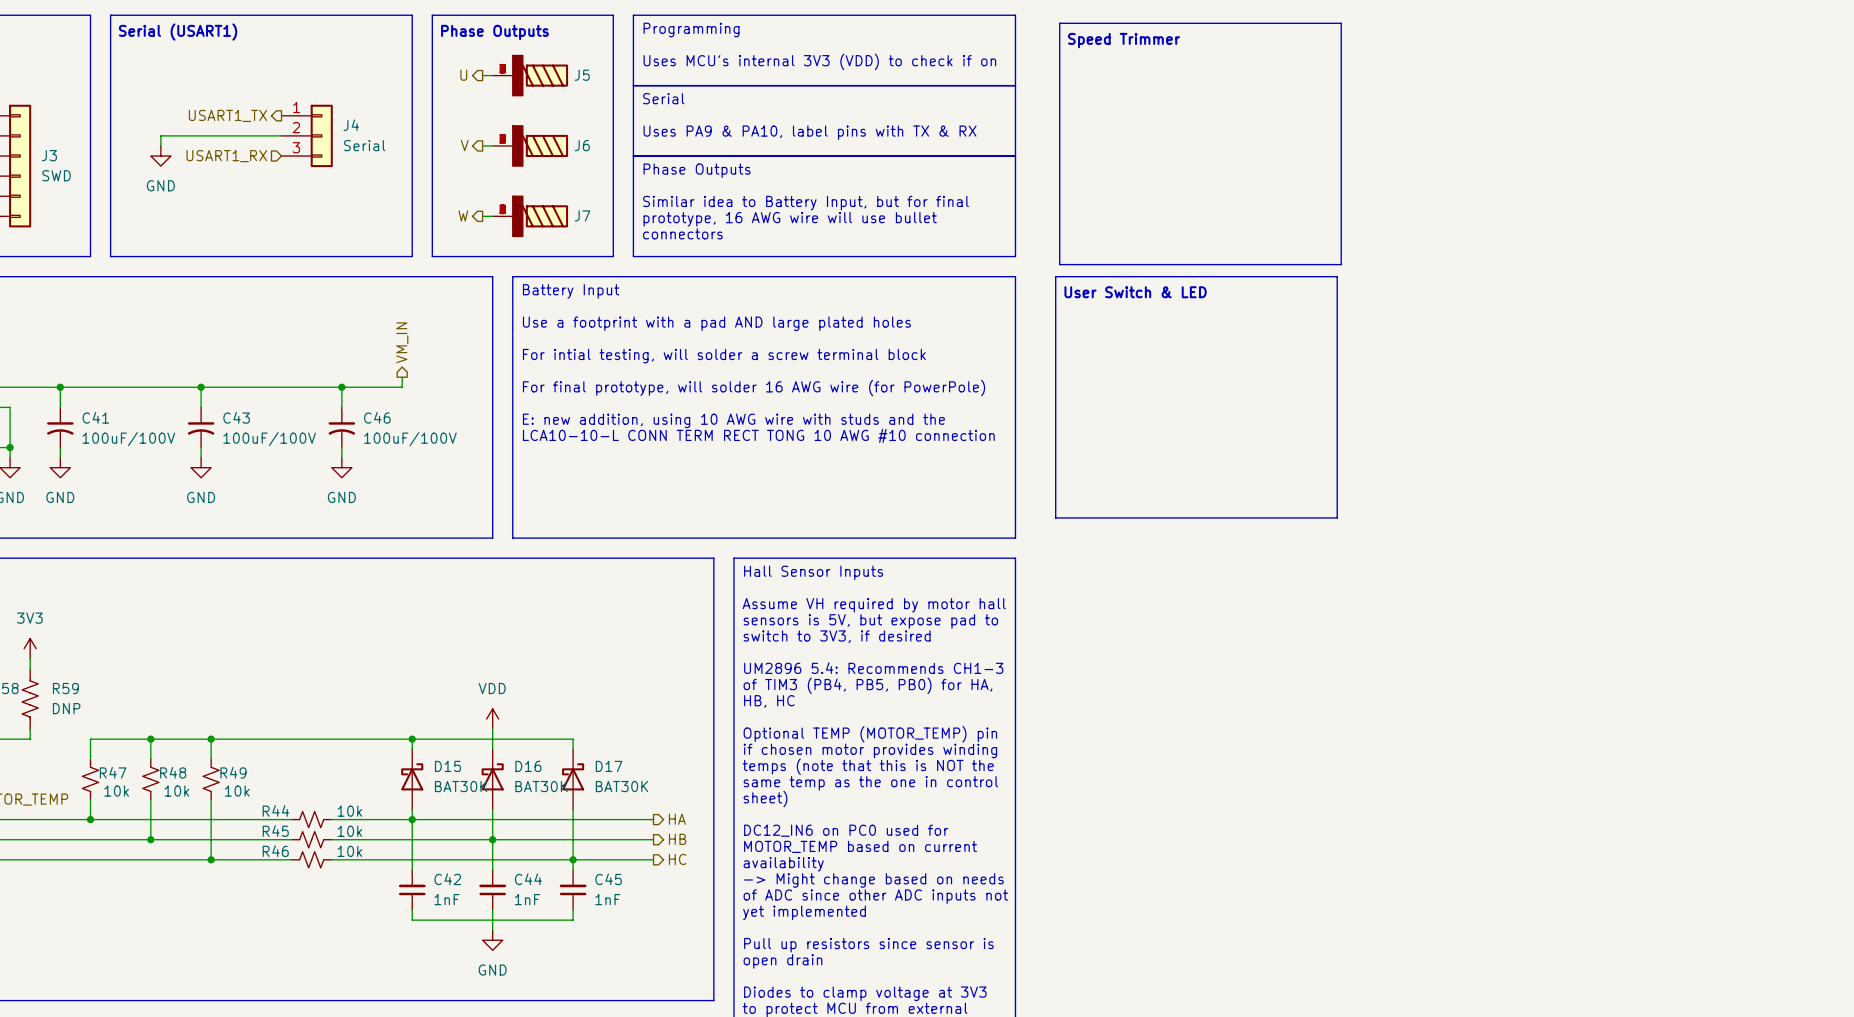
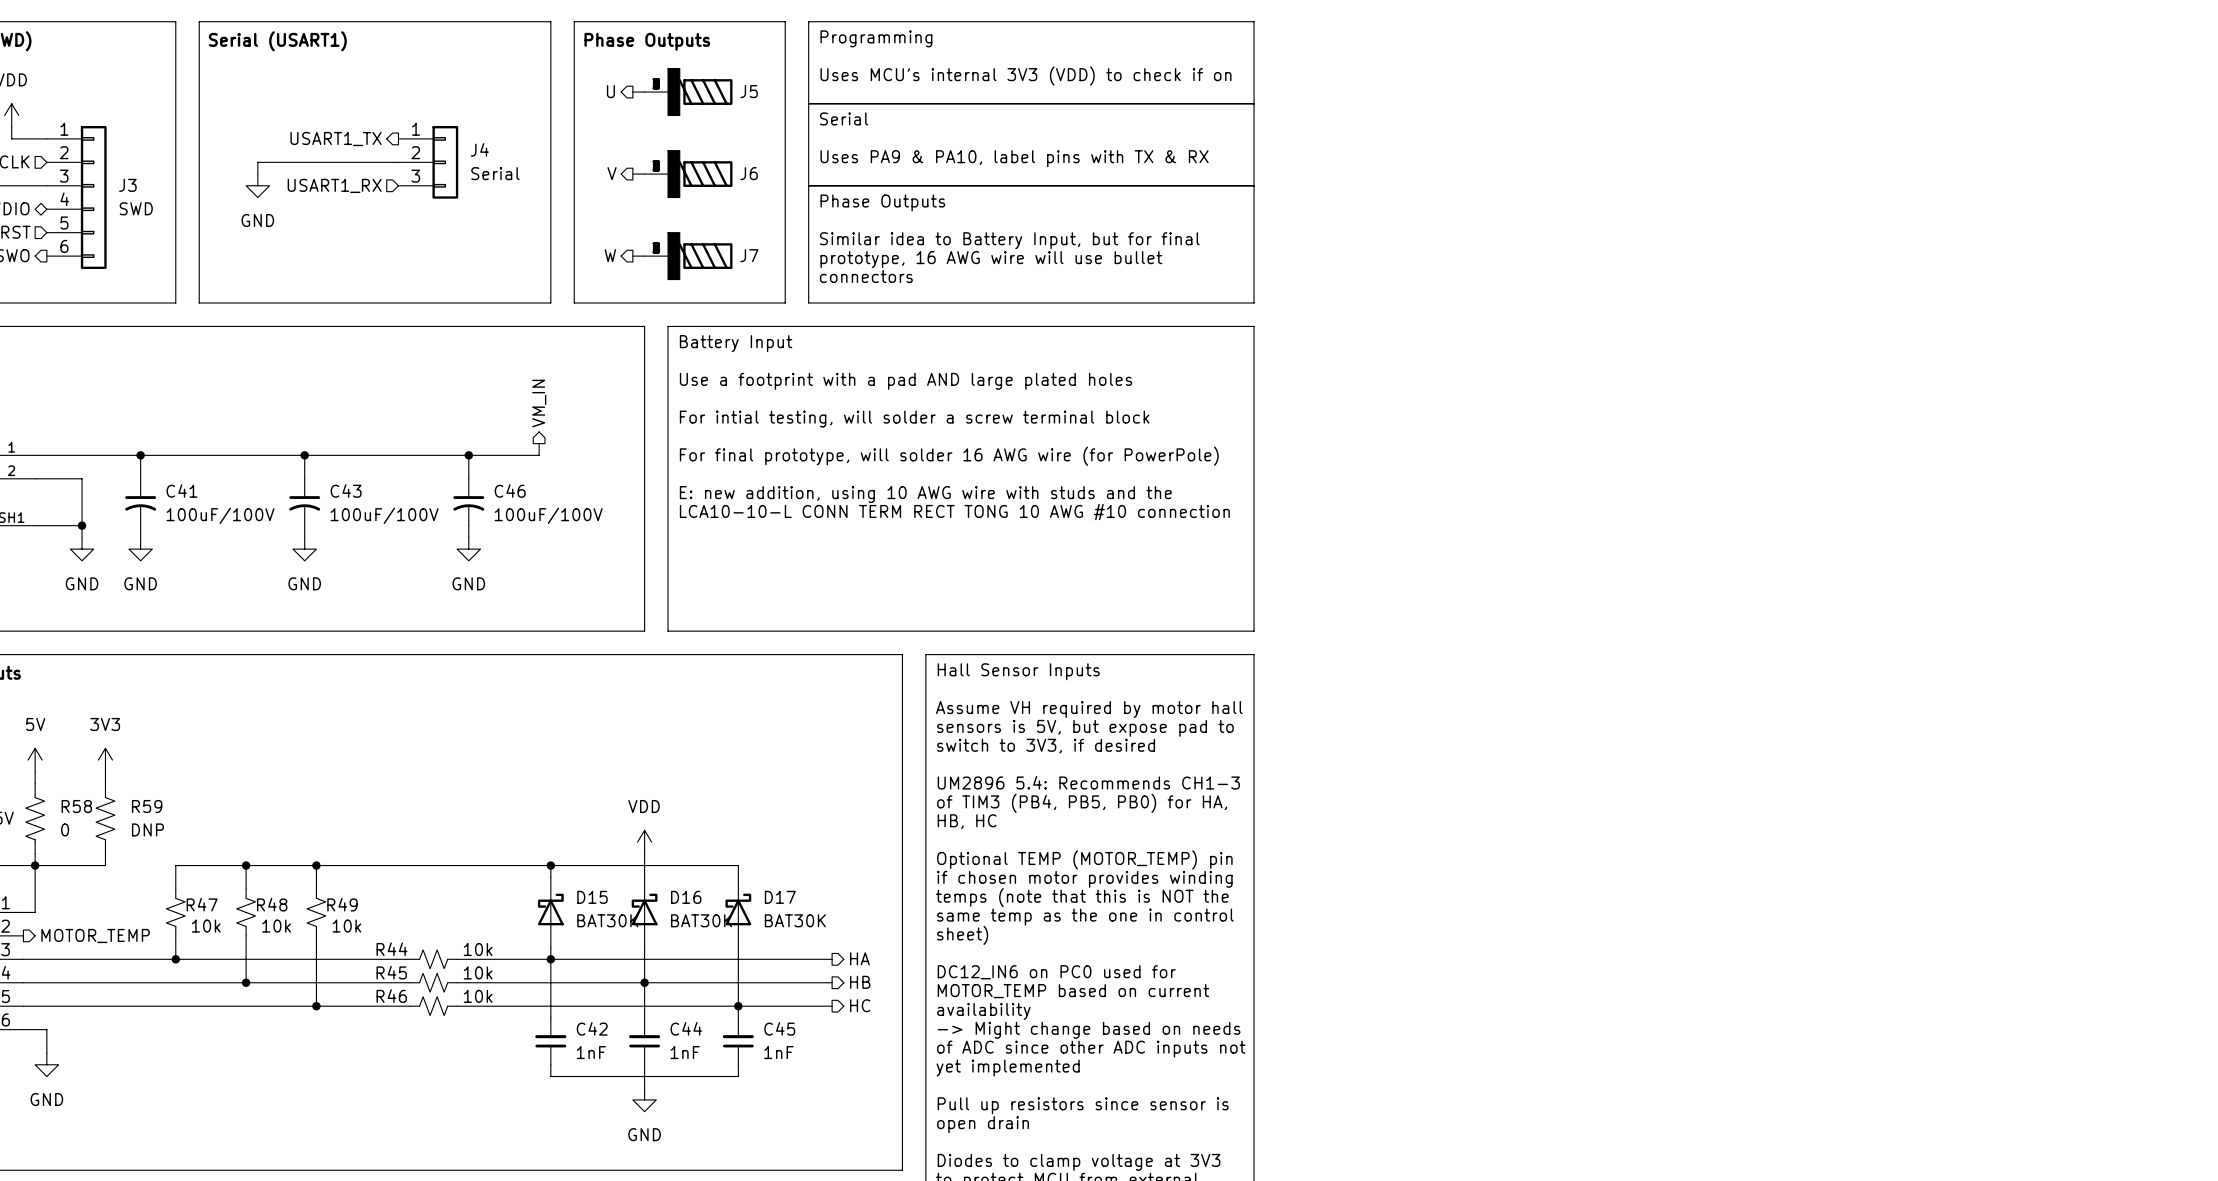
line: (1059, 23) (1341, 23) (1341, 264) (1059, 264) (1059, 23) -> none
text: Speed Trimmer (1124, 40) -> none
line: (1055, 276) (1337, 276) (1337, 517) (1055, 517) (1055, 276) -> none
text: User Switch & LED (1135, 292) -> none

